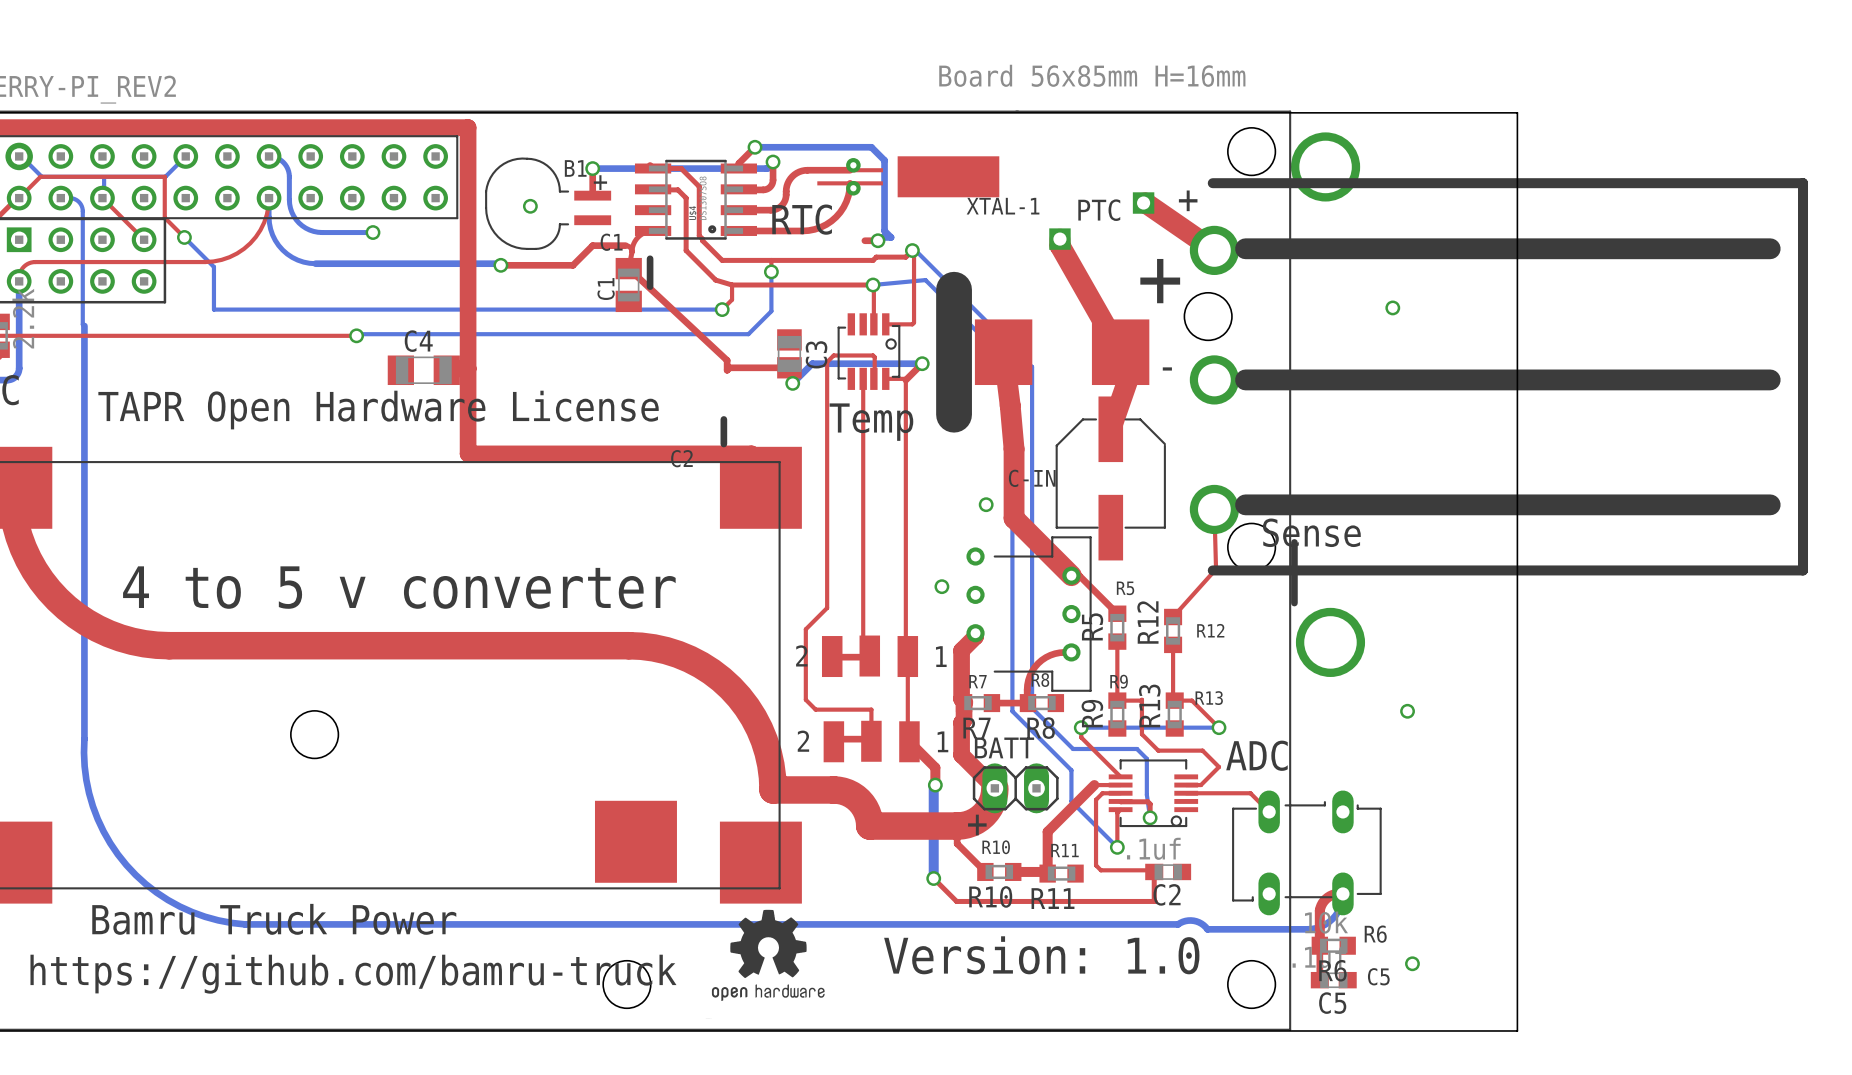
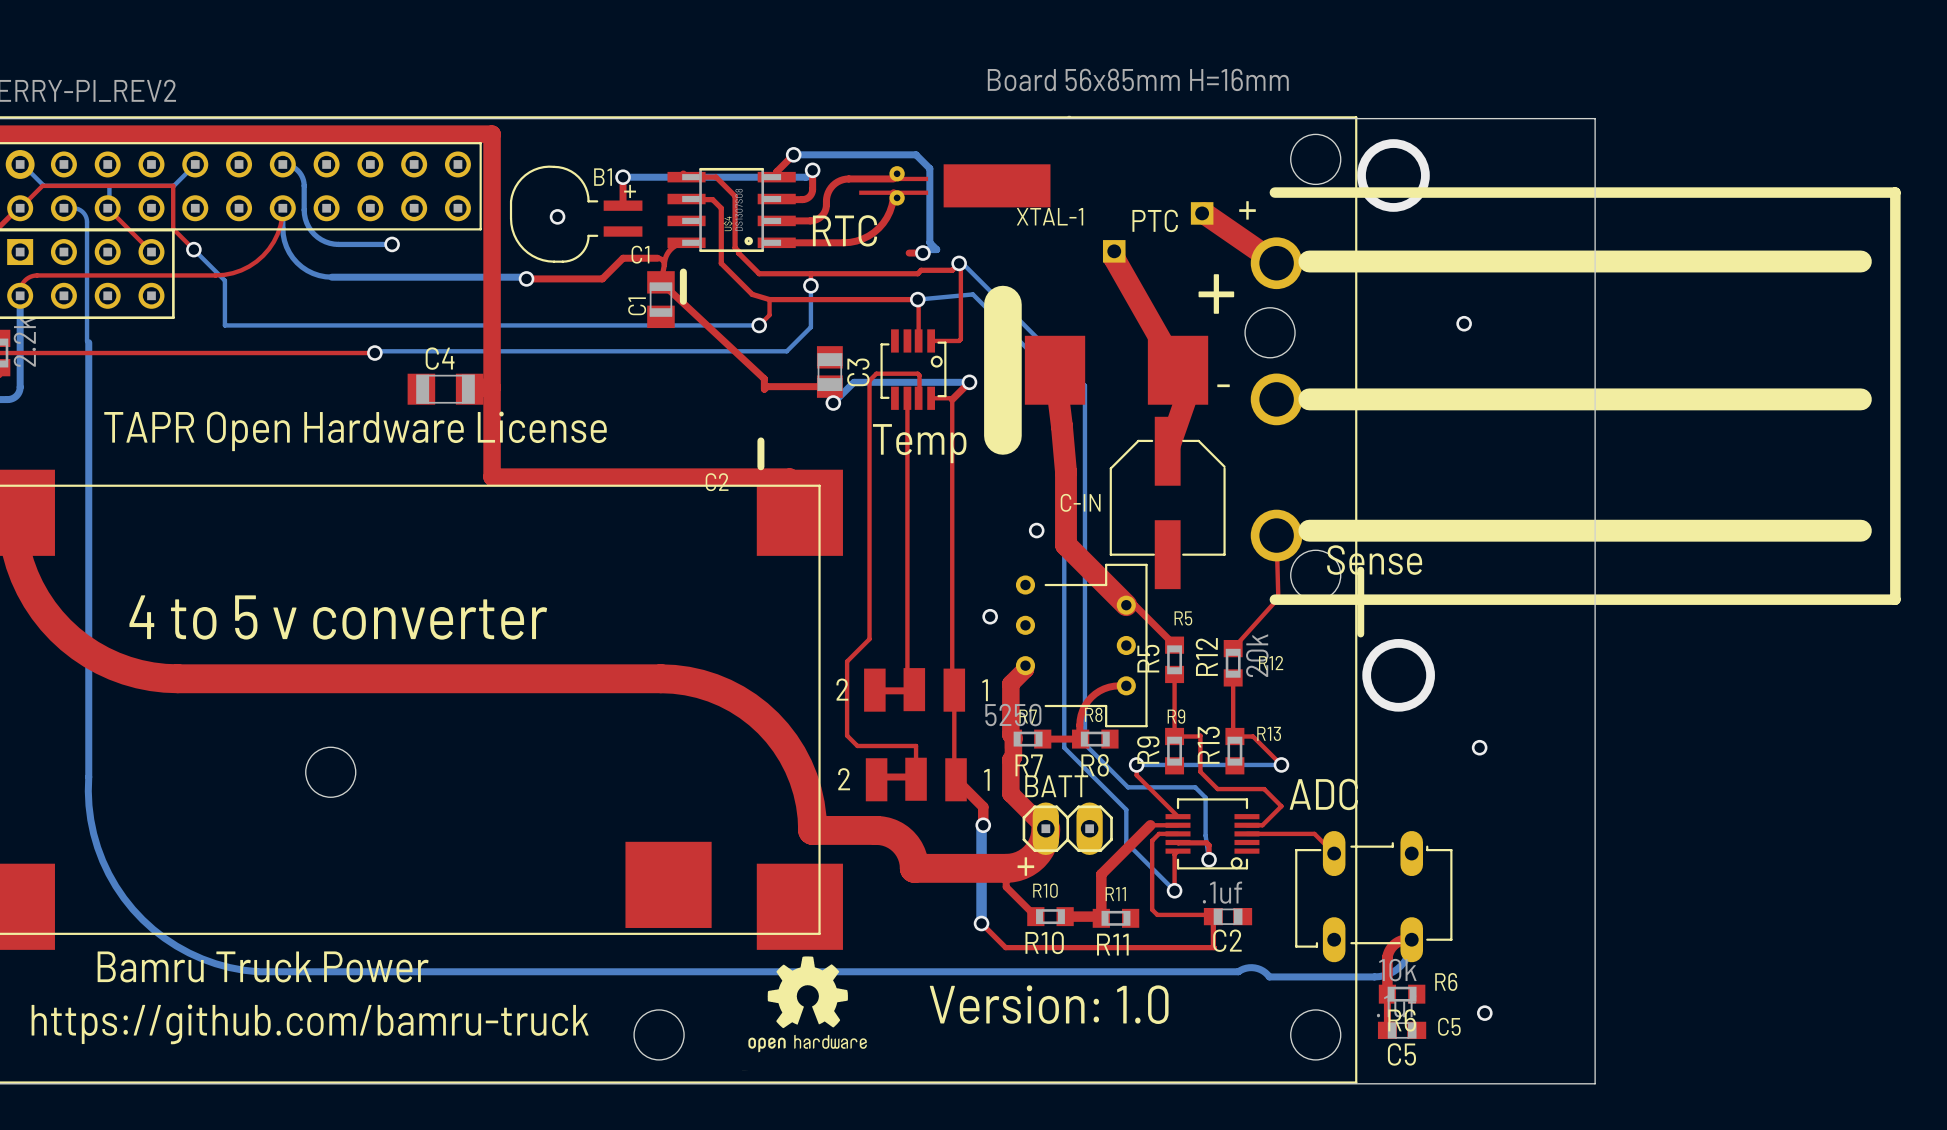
R12 value: none -> 20k (1257, 655)
R7 value: none -> 5250 (1013, 715)

